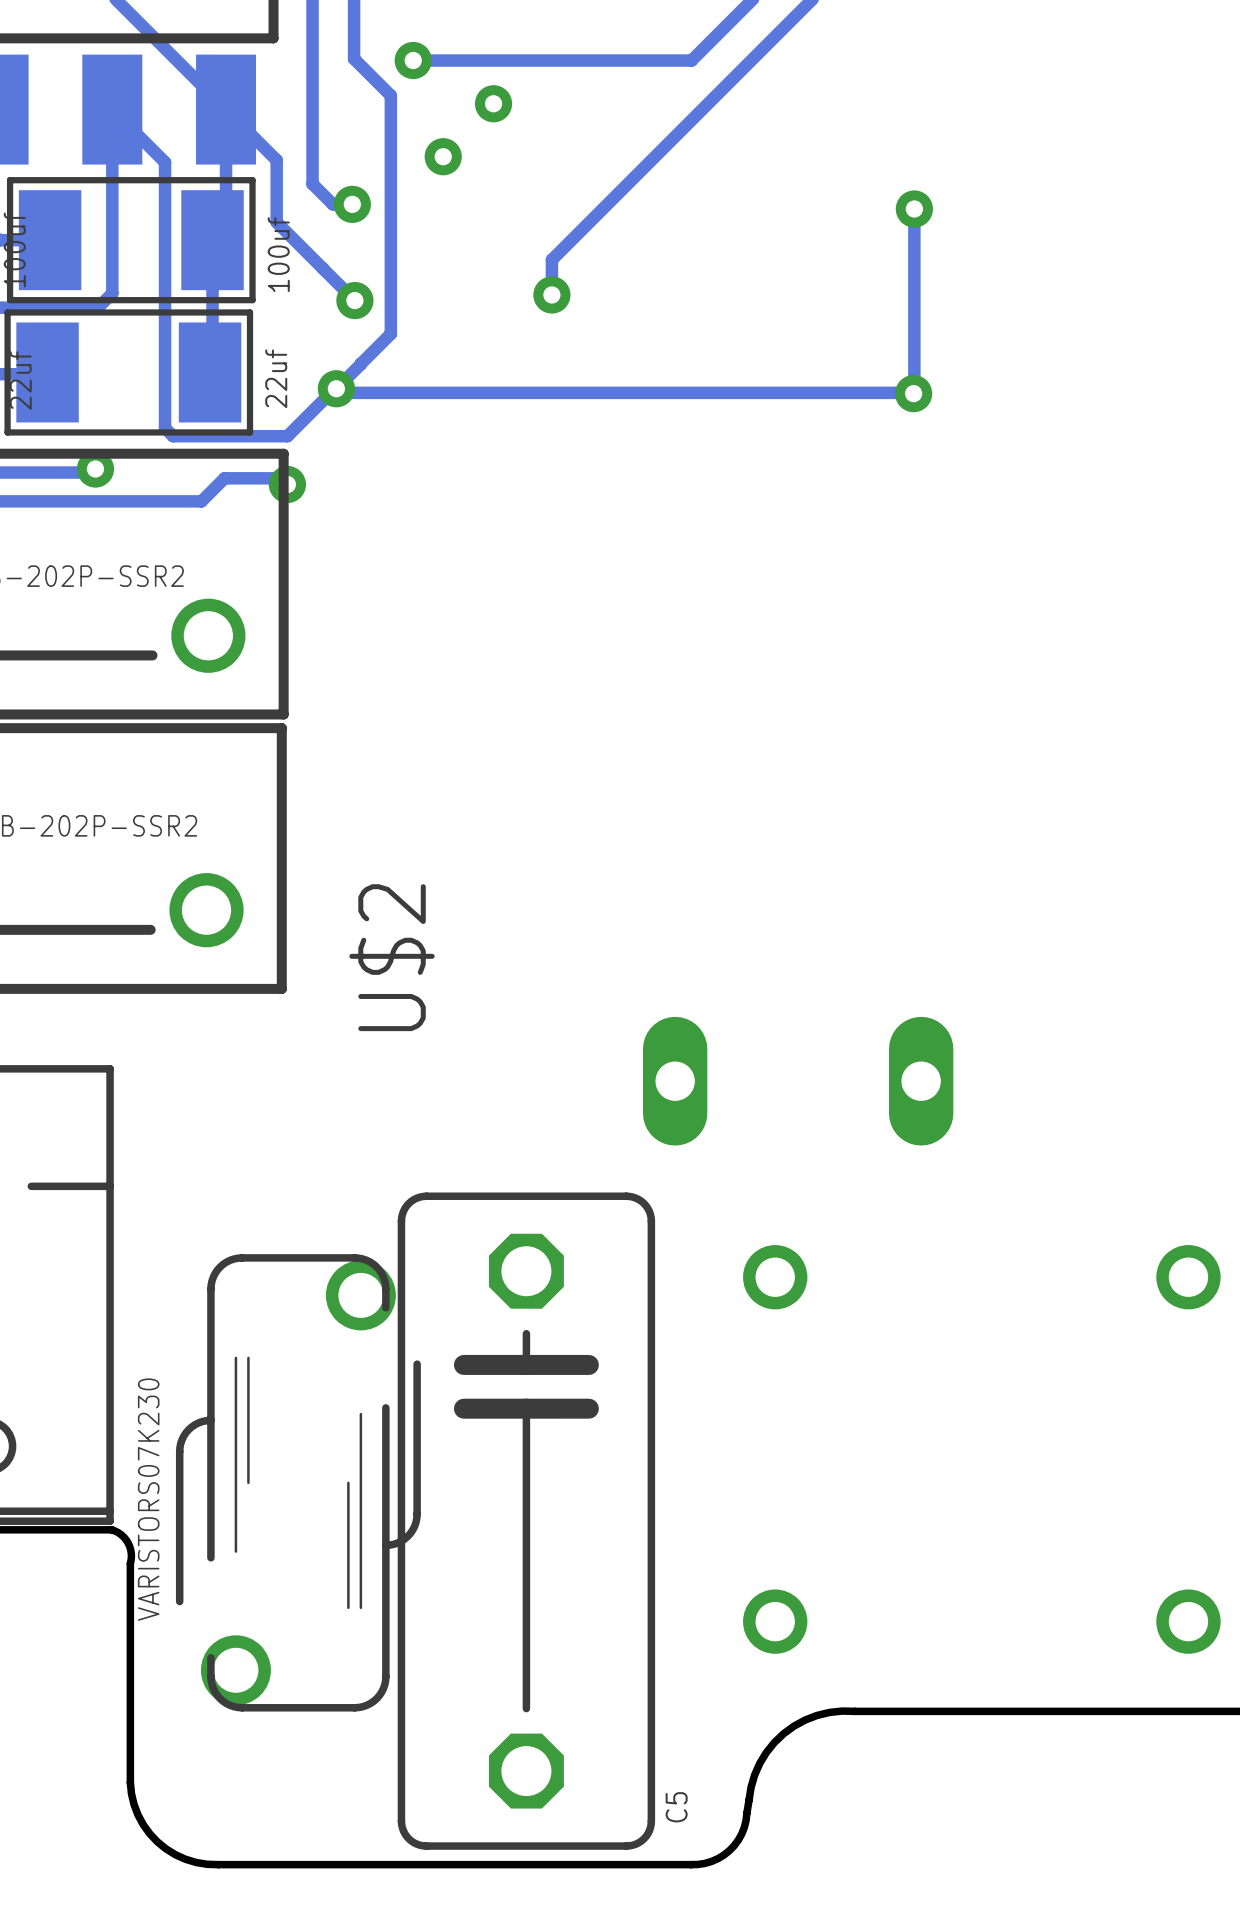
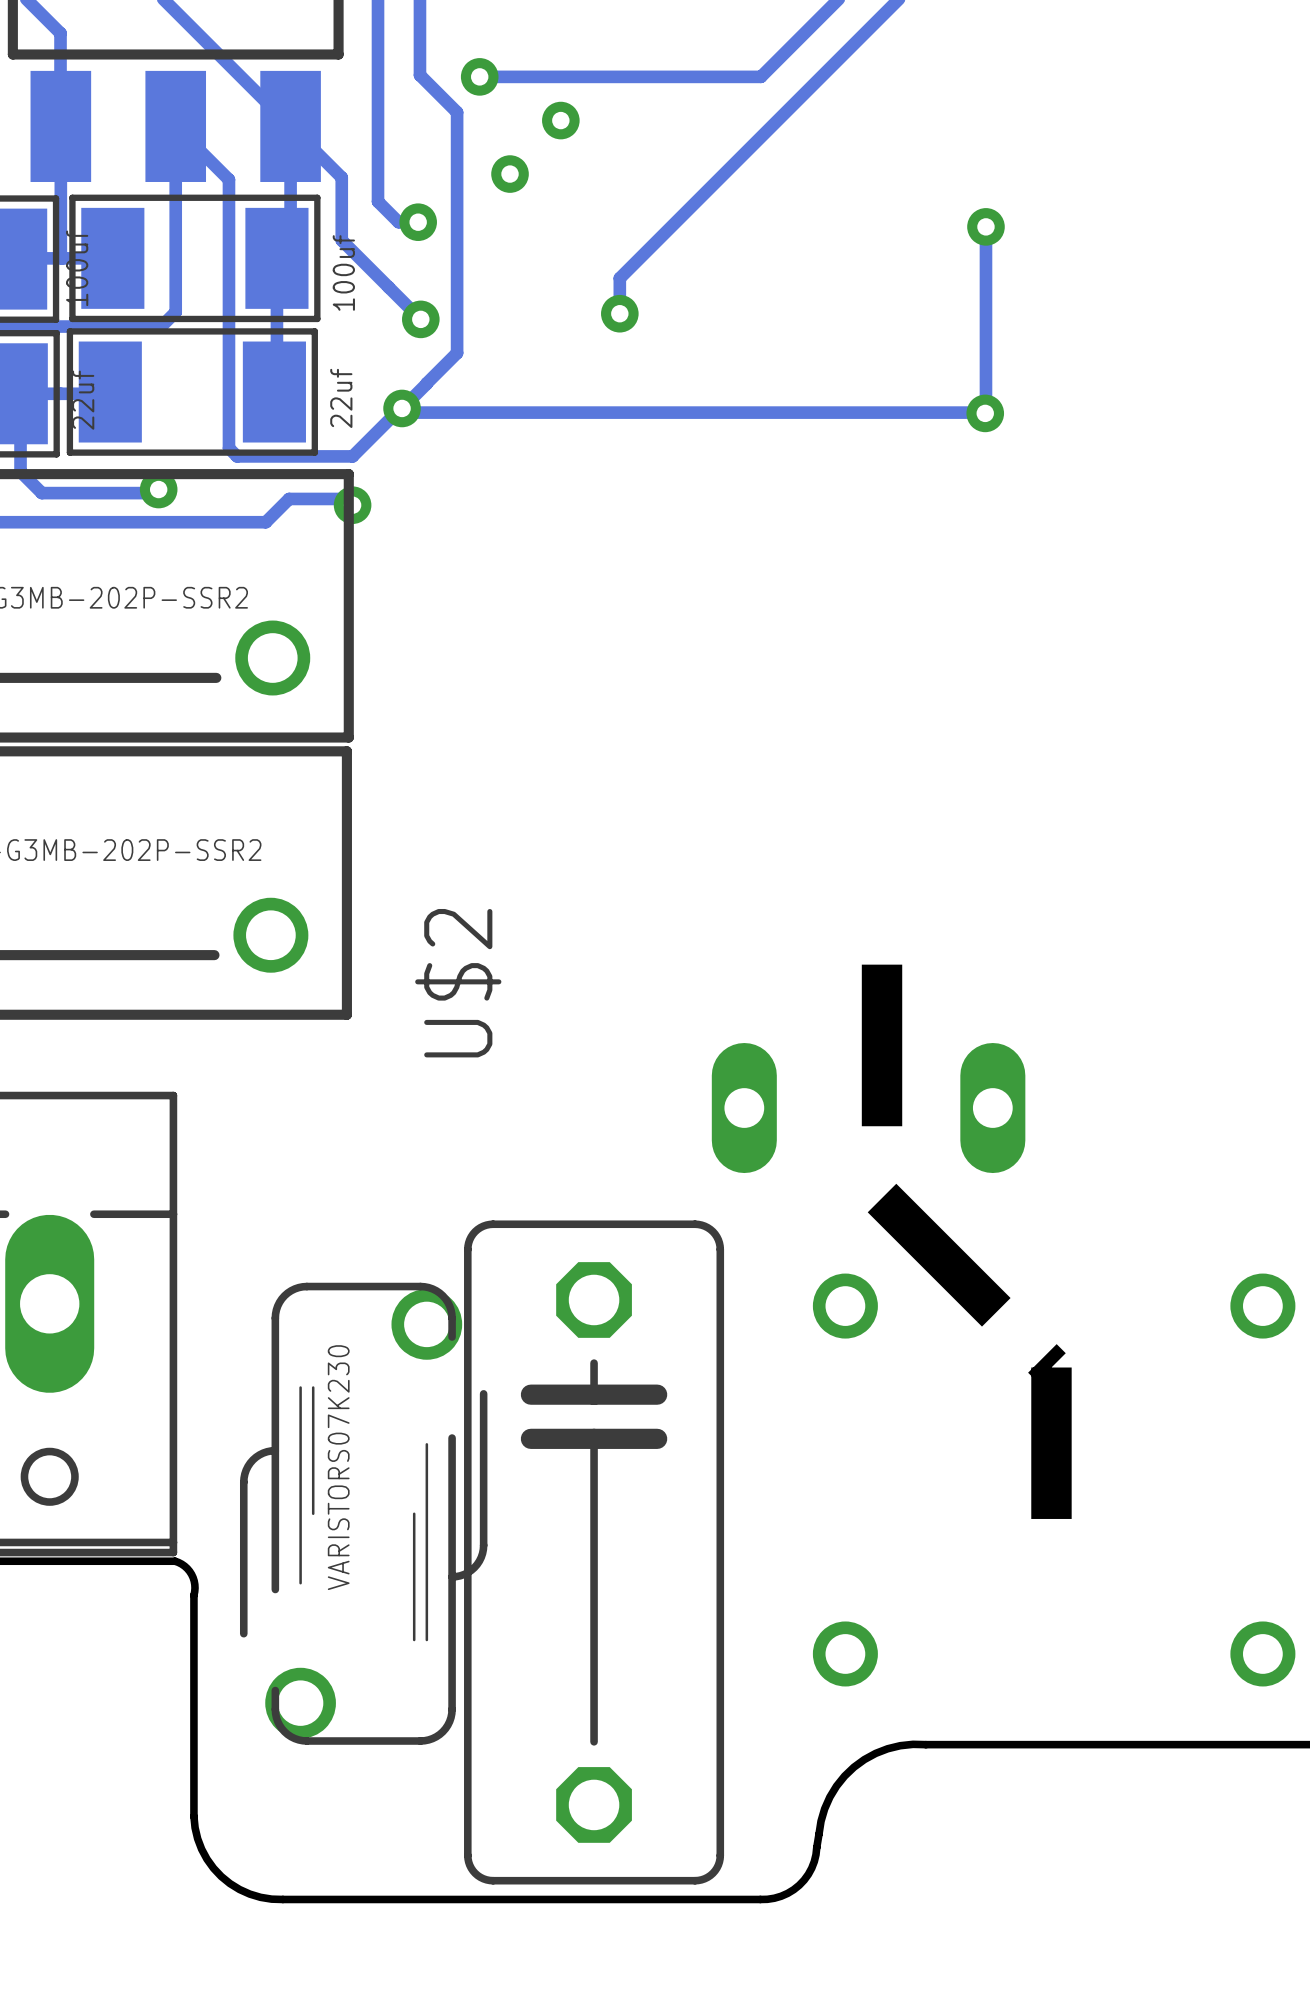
board edge: none -> (882, 964) (882, 1198) (1051, 1367) (1051, 1518)
part value position: VARISTORS07K230 (148, 1499) -> VARISTORS07K230 (338, 1467)
C5 name: C5 (676, 1807) -> none

